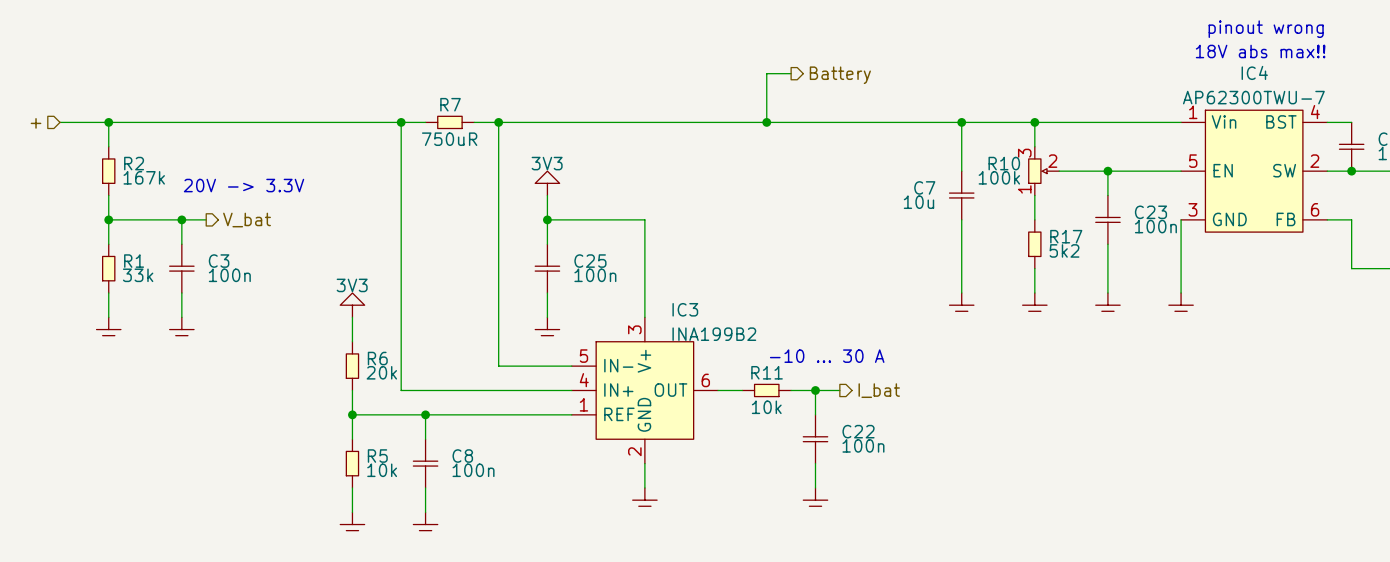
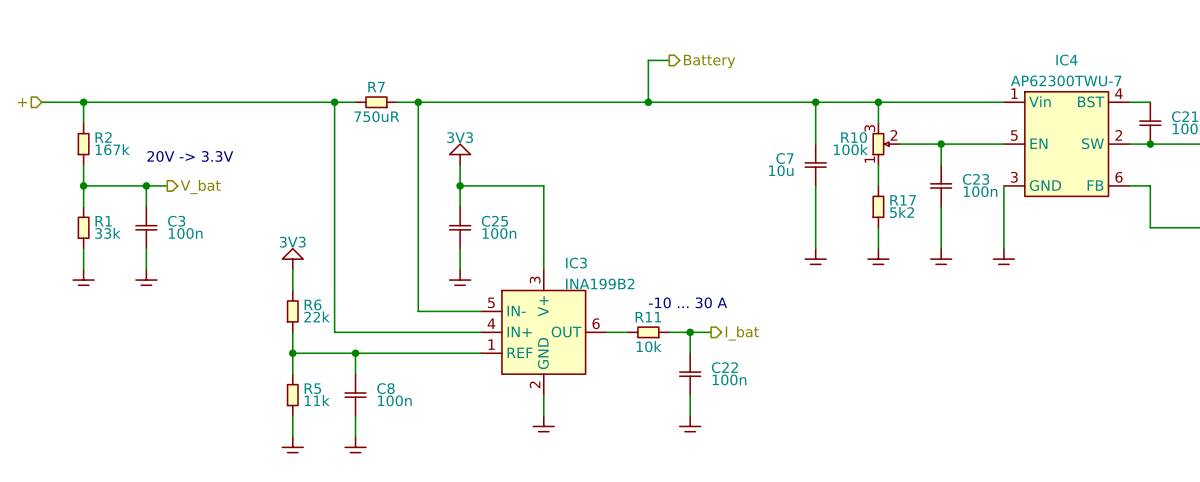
text: pinout wrong (1266, 29) -> none
text: 18V abs max!! (1260, 51) -> none
R6 value: 20k (381, 372) -> 22k (317, 316)
R5 value: 10k (382, 470) -> 11k (317, 400)

